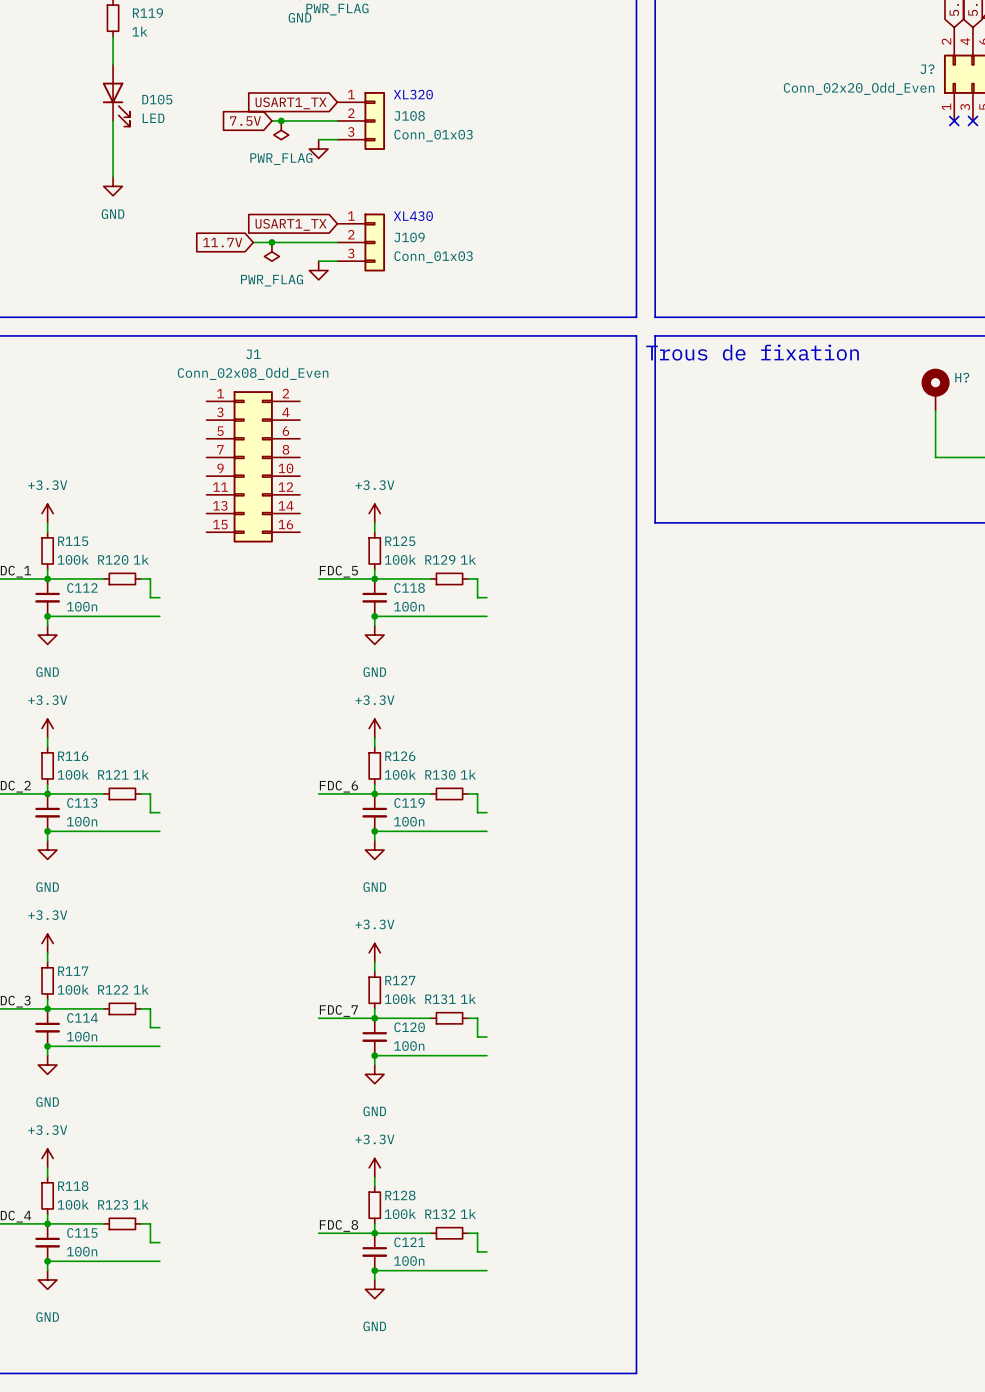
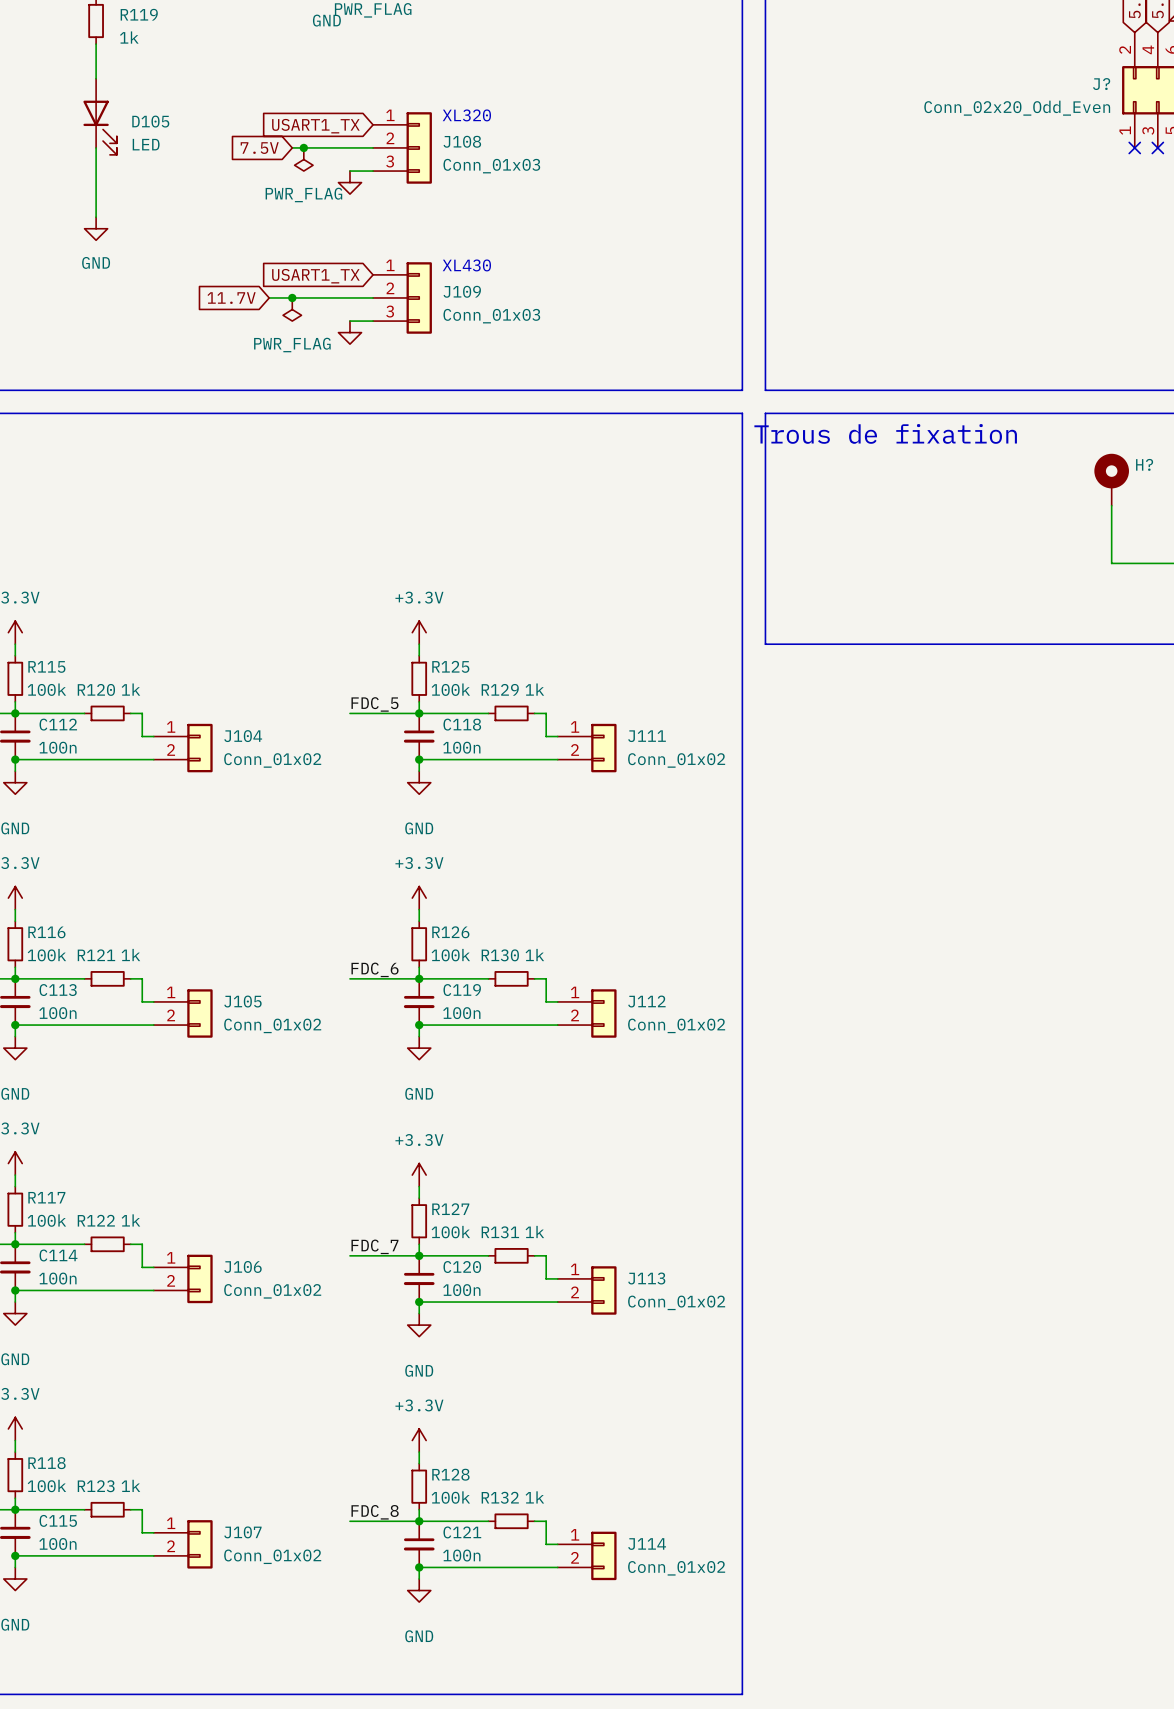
J1: Conn_02x08_Odd_Even (253, 466) -> none
J104: none -> Conn_01x02 (183, 748)
J111: none -> Conn_01x02 (587, 748)
J105: none -> Conn_01x02 (183, 1013)
J112: none -> Conn_01x02 (587, 1013)
J106: none -> Conn_01x02 (183, 1278)
J113: none -> Conn_01x02 (587, 1290)
J107: none -> Conn_01x02 (183, 1544)
J114: none -> Conn_01x02 (587, 1555)

